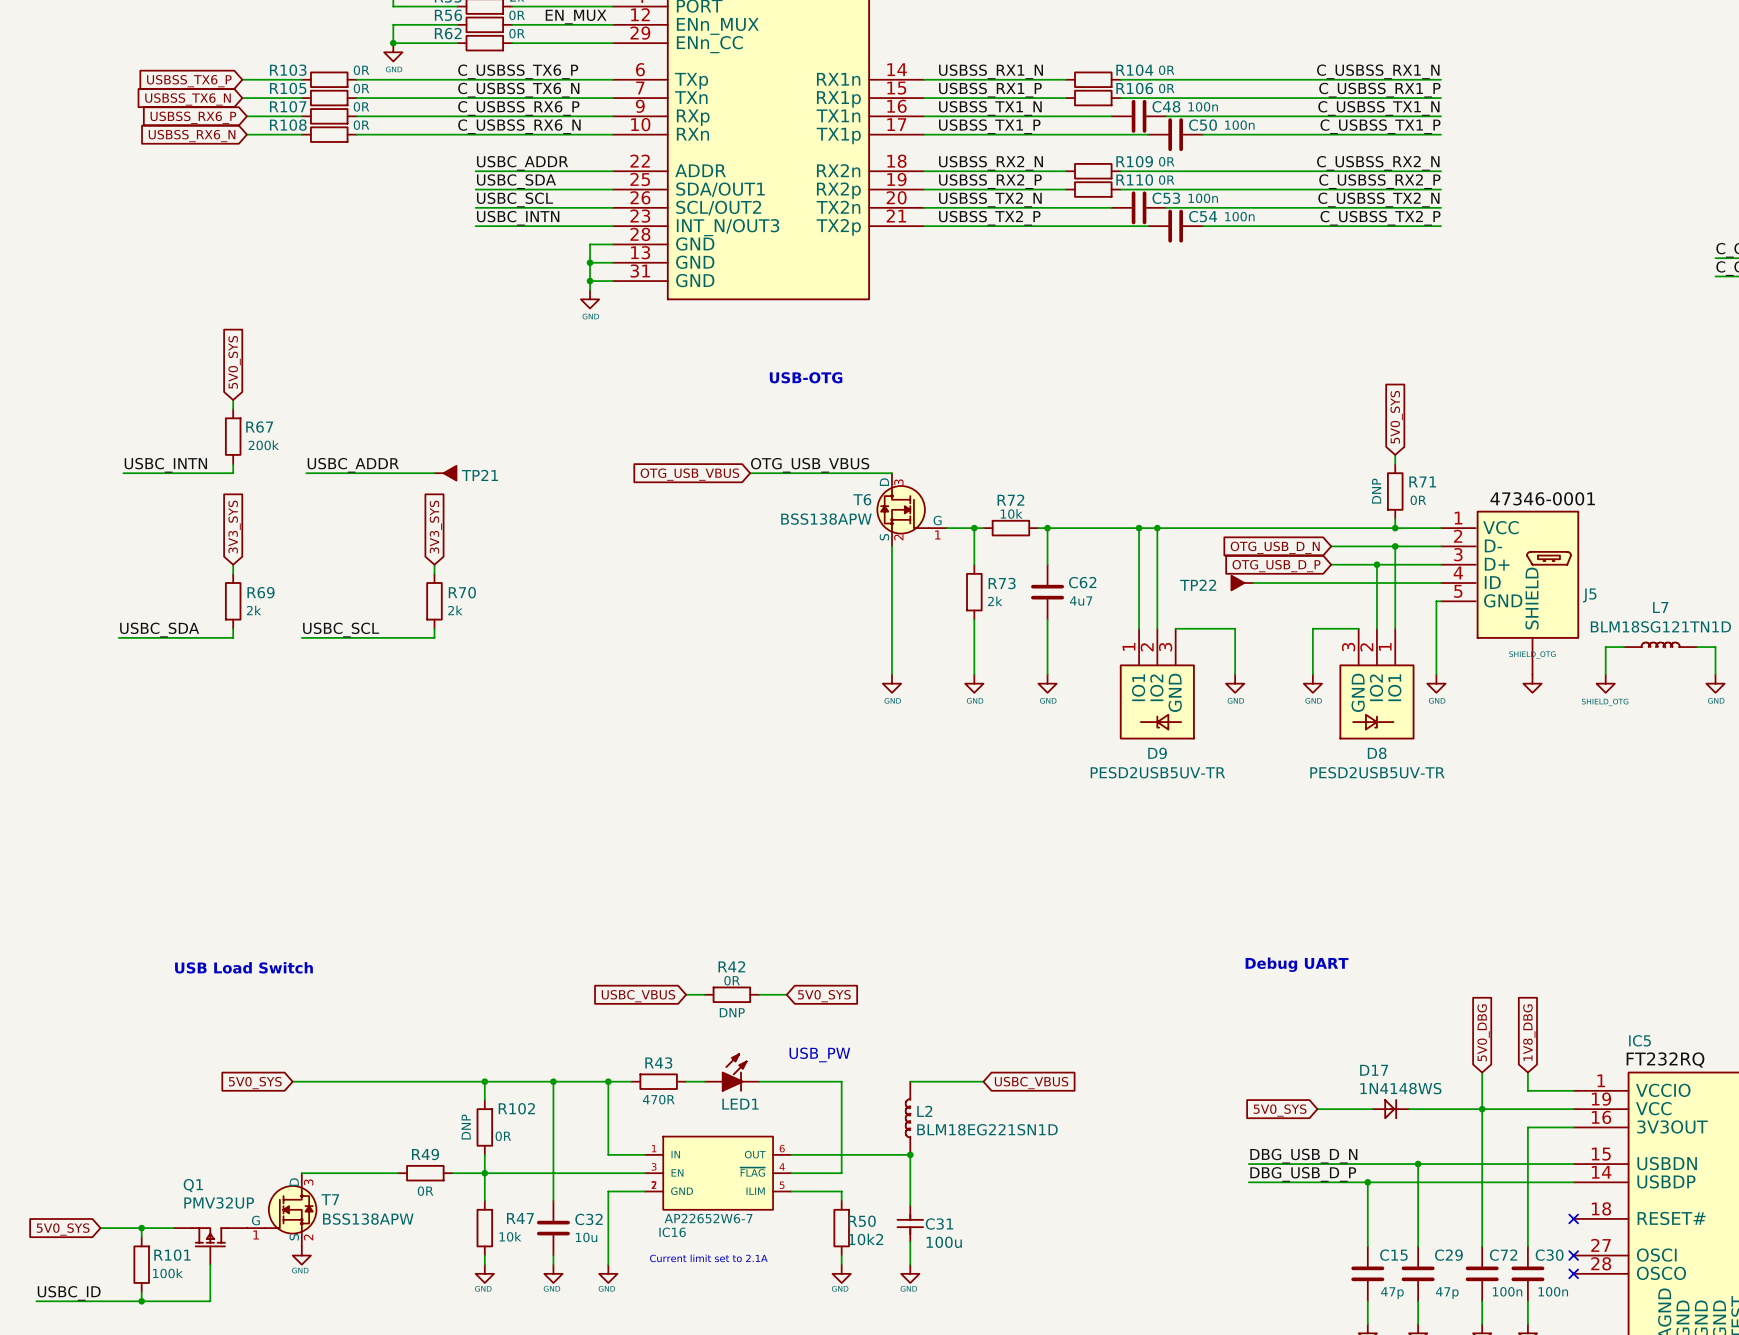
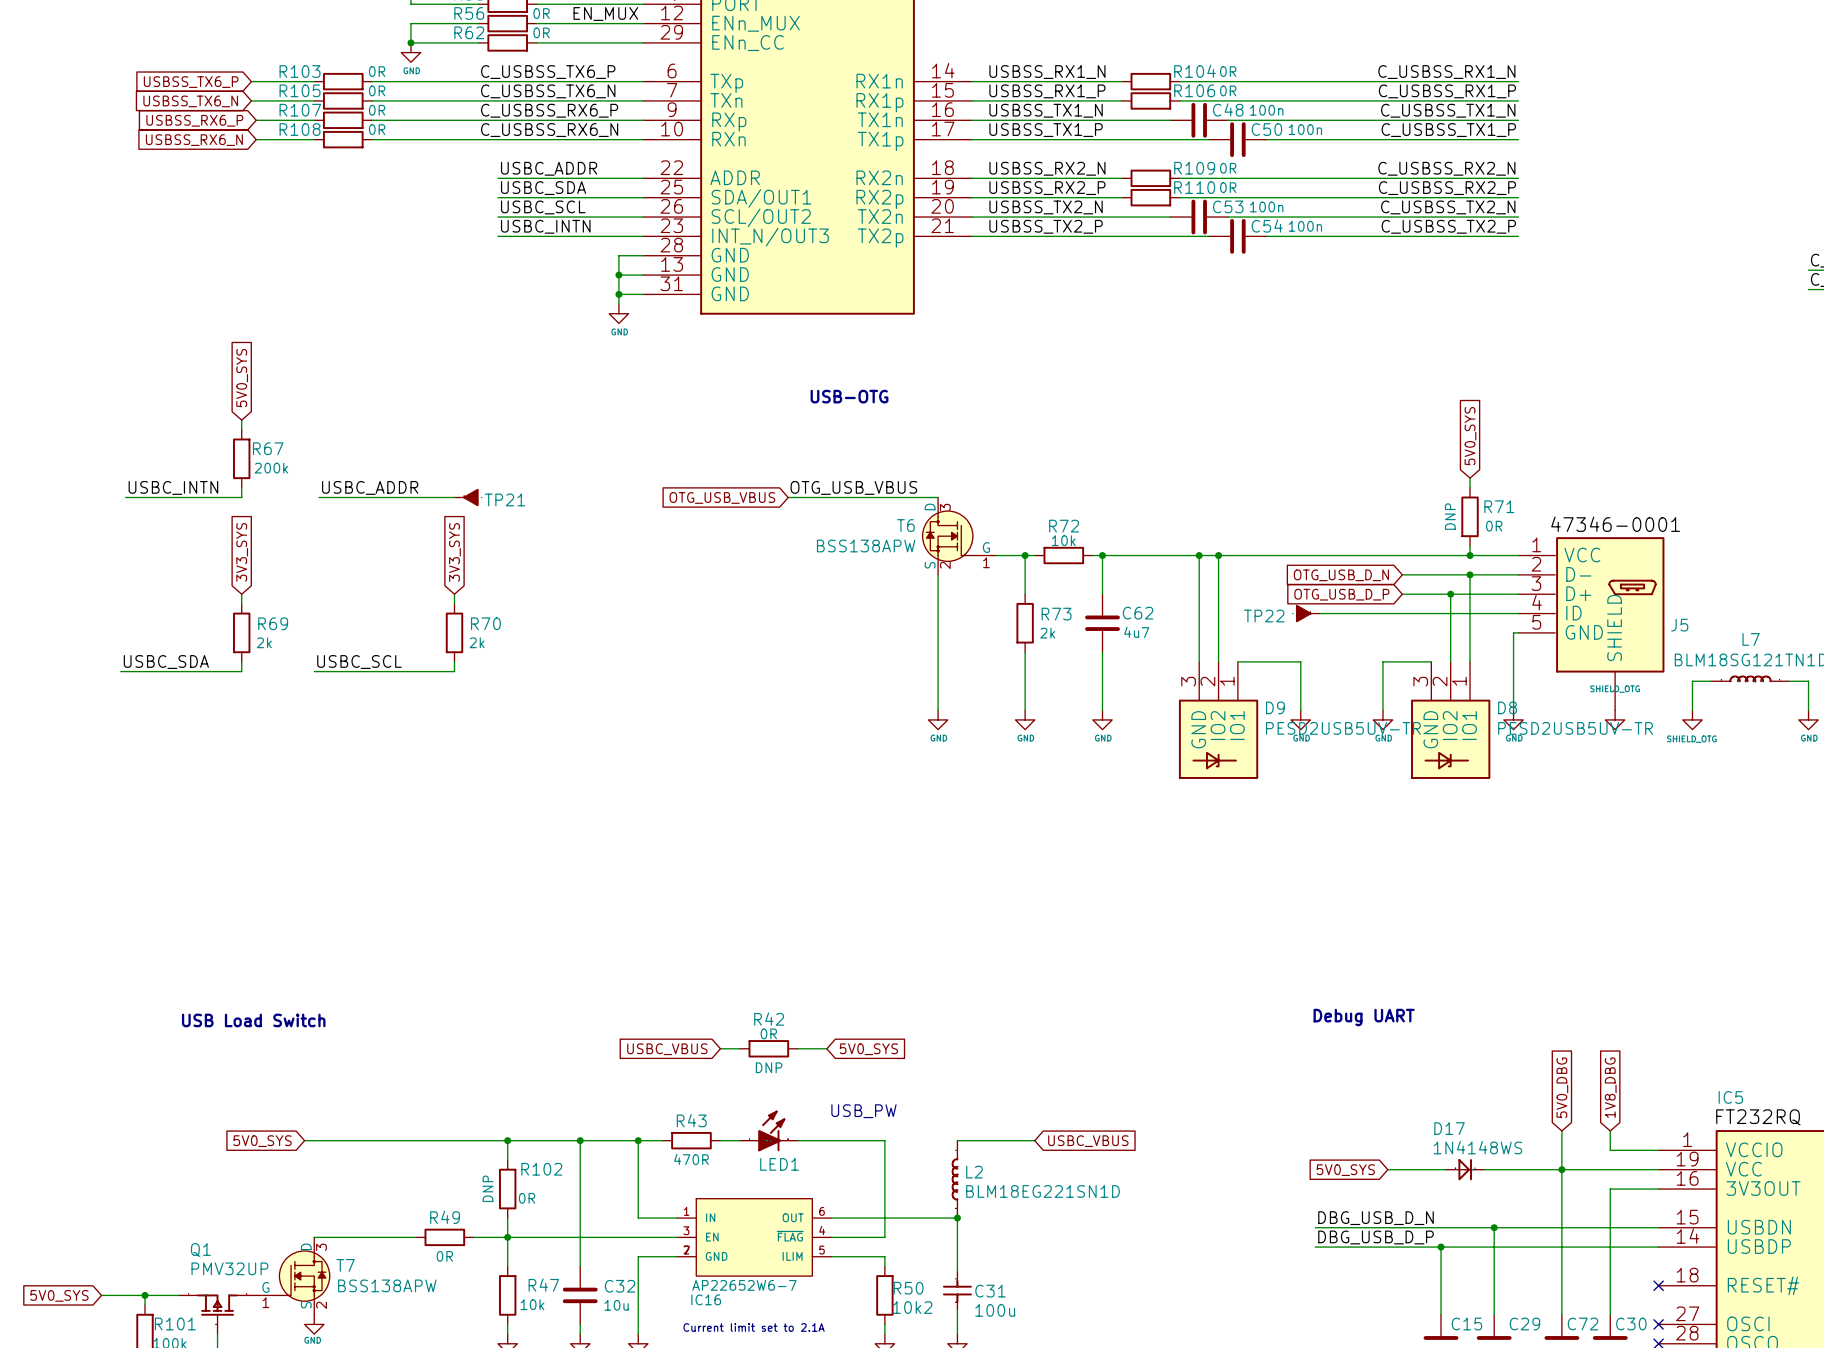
D9 flip: as is (1157, 701) -> left-right (1218, 739)
D9 name position: D9 (1157, 753) -> D9 (1275, 707)
D8 name position: D8 (1377, 753) -> D8 (1507, 707)
D9 value position: PESD2USB5UV-TR (1157, 772) -> PESD2USB5UV-TR (1343, 728)
D8 value position: PESD2USB5UV-TR (1377, 772) -> PESD2USB5UV-TR (1575, 728)

